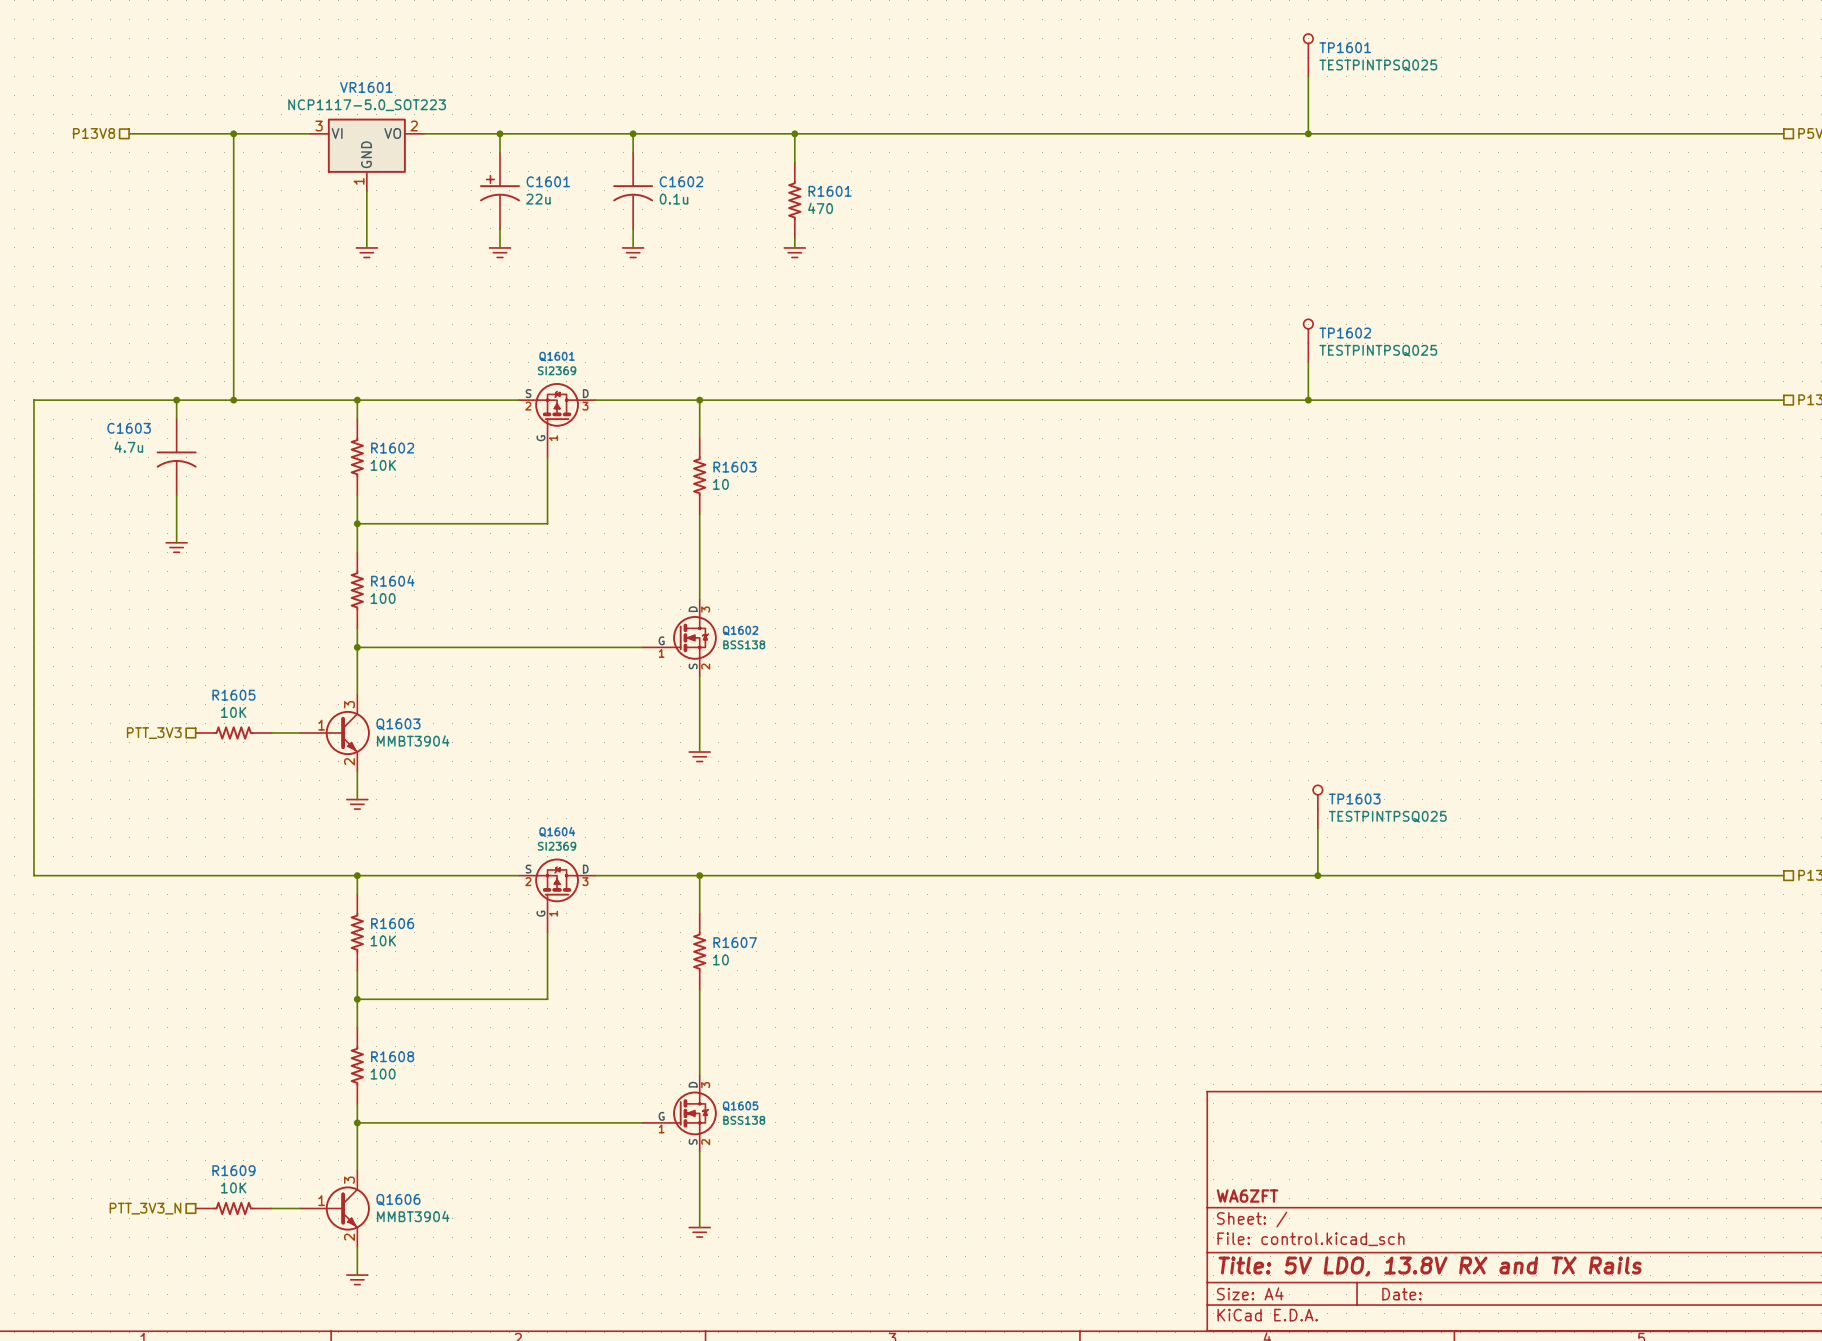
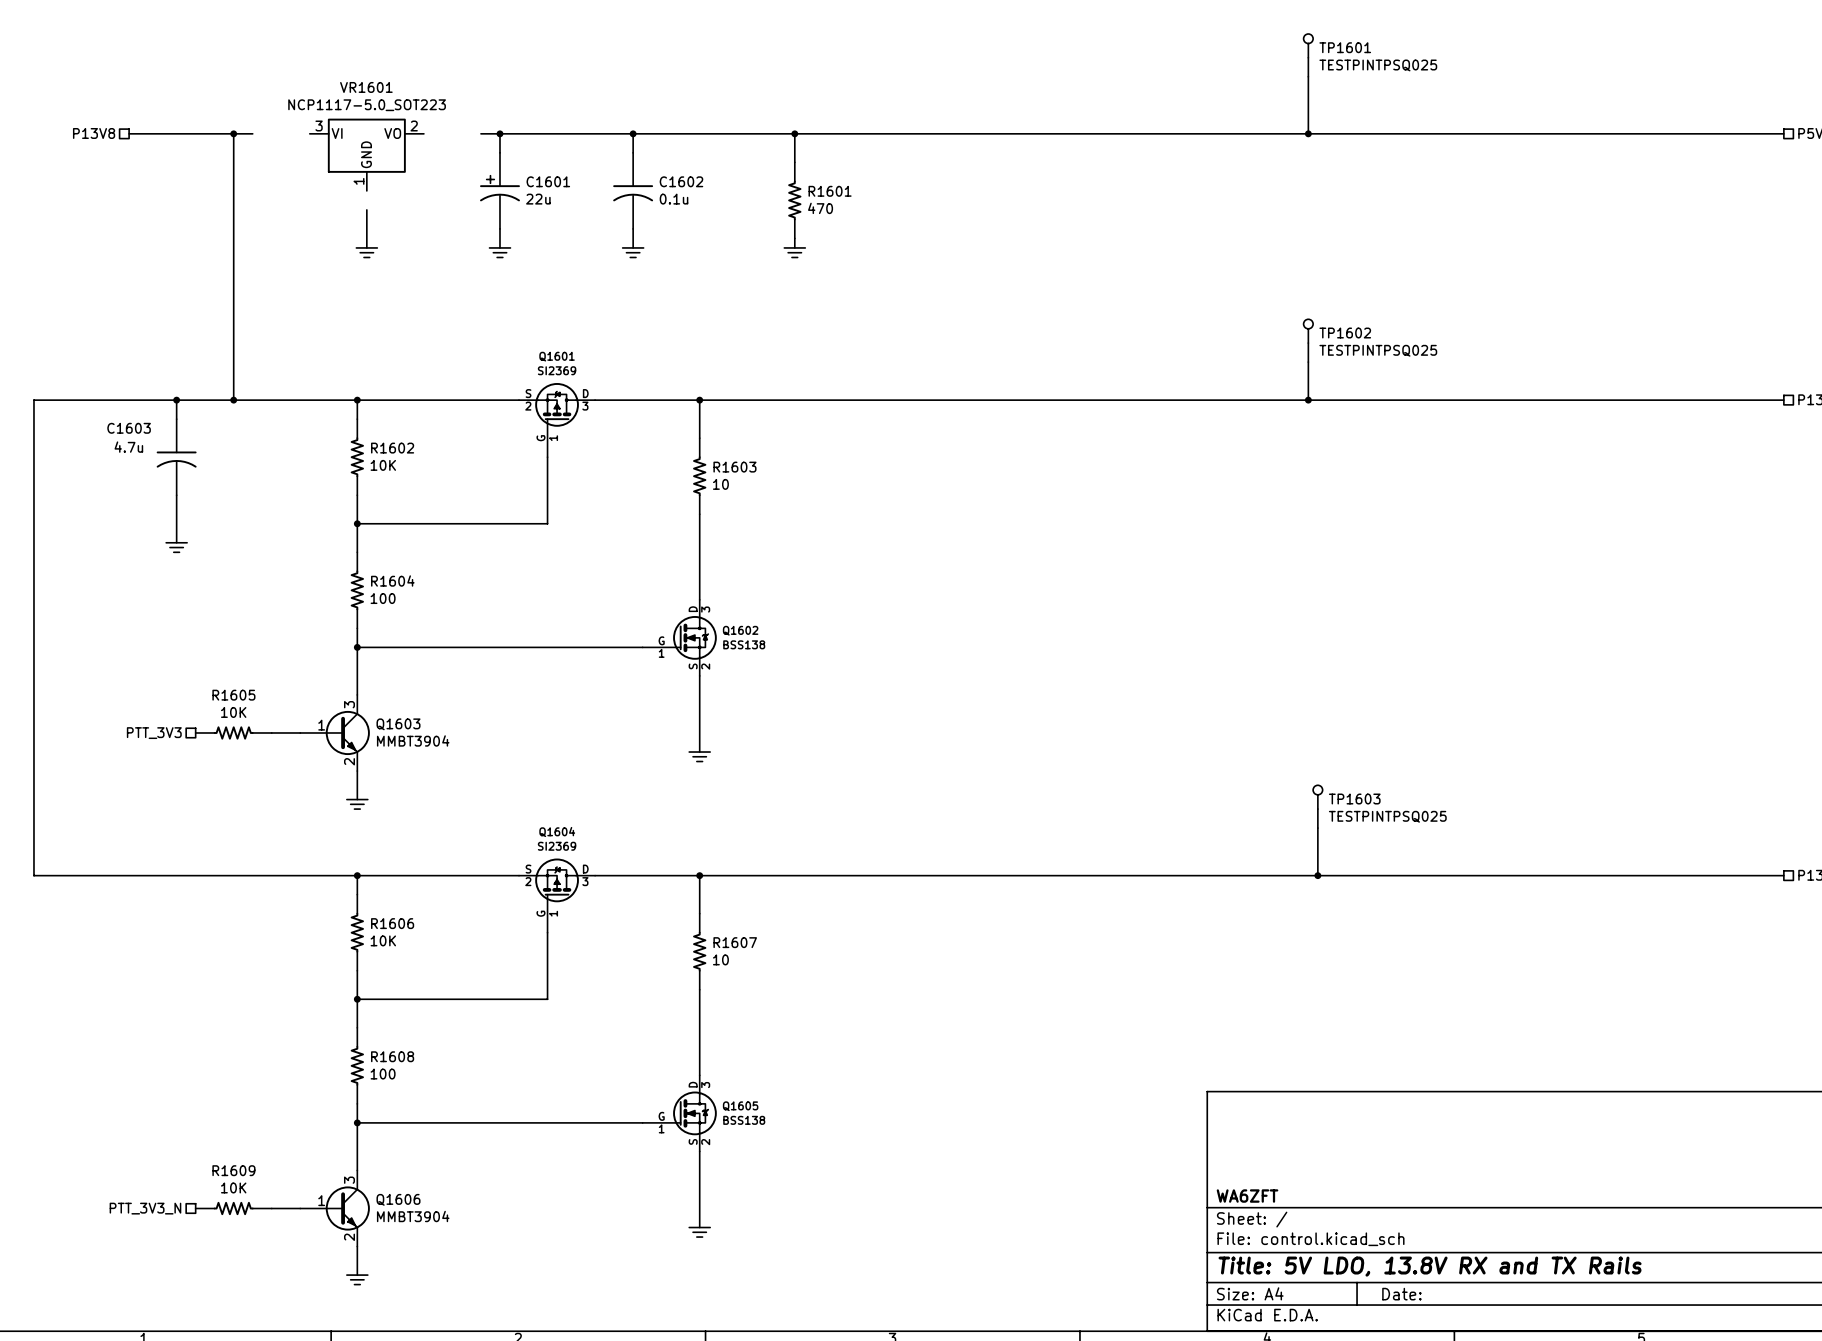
wire: (252, 133) (309, 133) -> none
wire: (423, 133) (480, 133) -> none
wire: (366, 190) (366, 209) -> none

